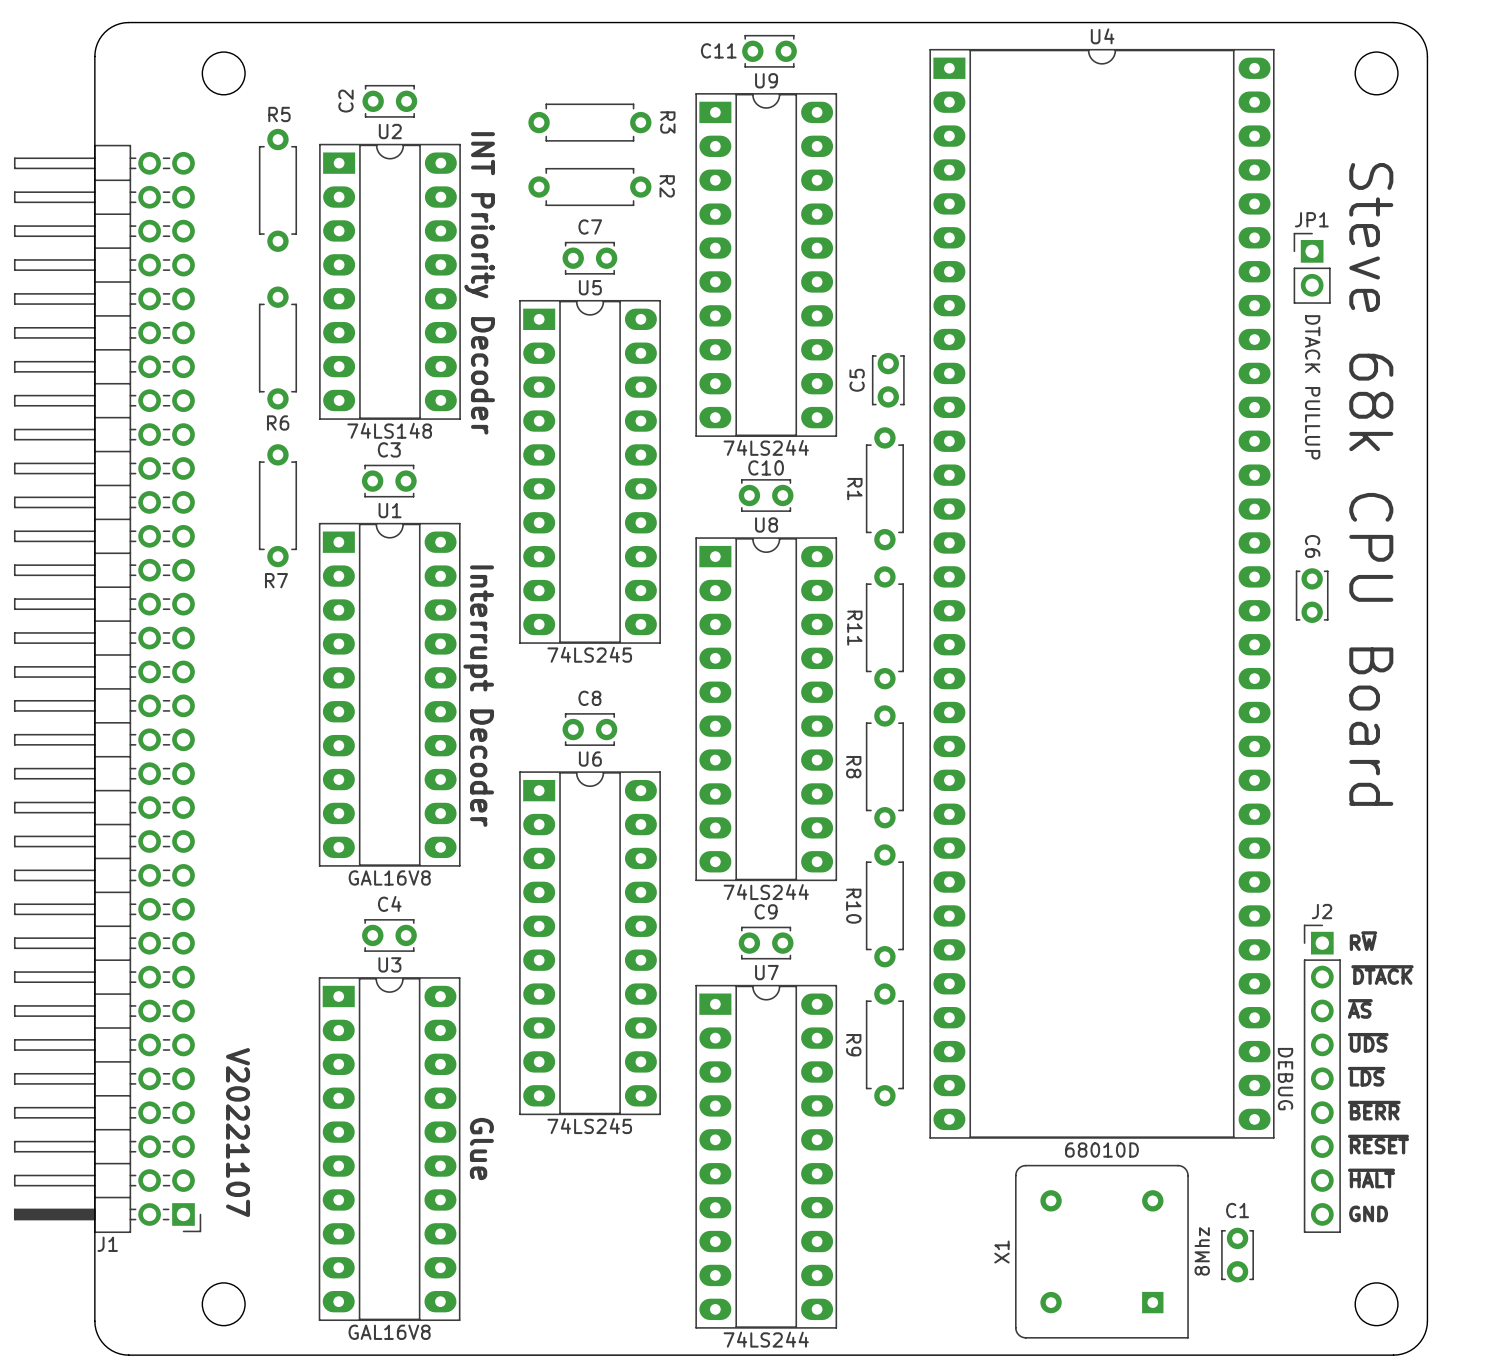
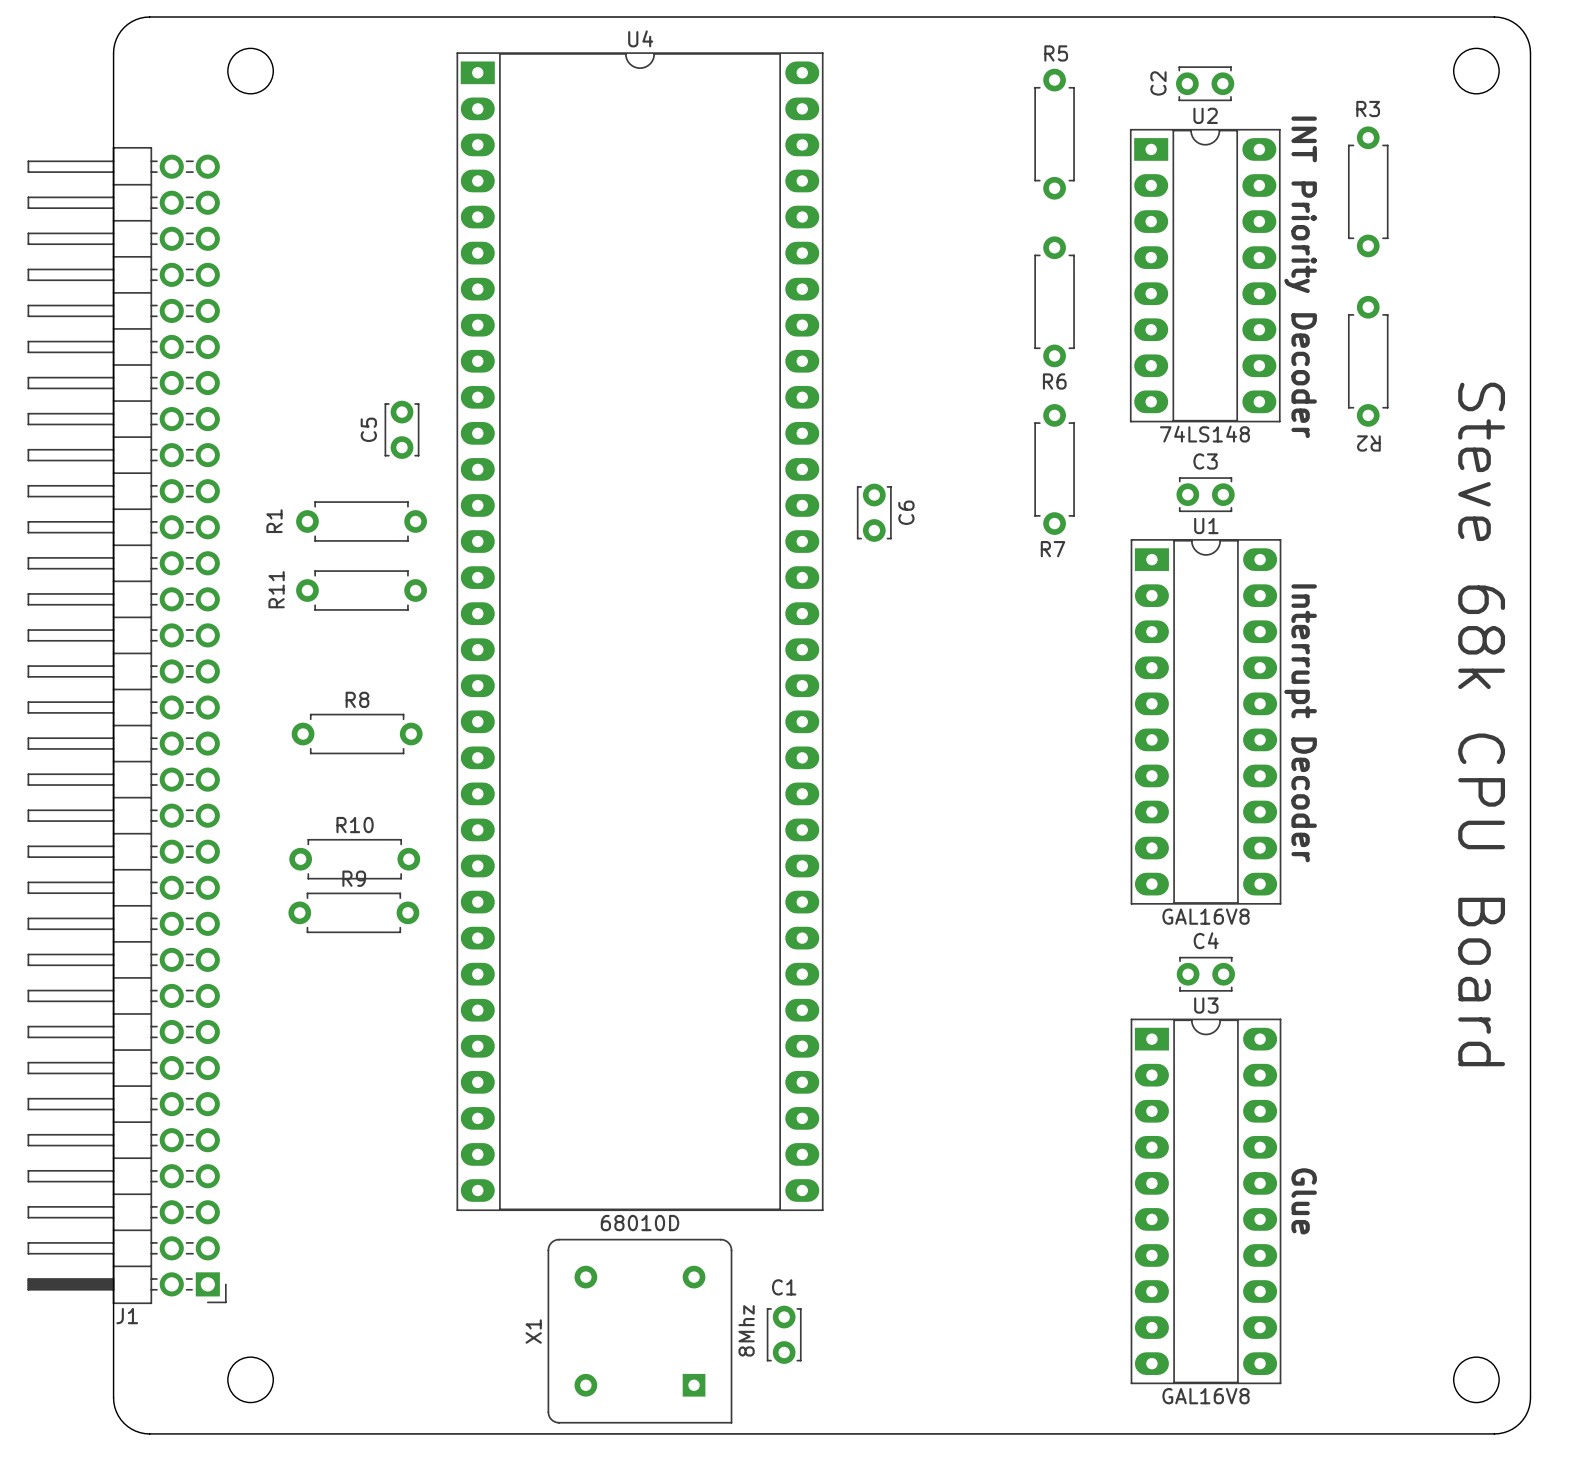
C11: (769, 51) -> none
C2 position: (389, 101) -> (1205, 83)
R3 rotation: 0° (589, 122) -> 90° clockwise (1368, 191)
R3 position: (589, 122) -> (1368, 191)
R3 name position: R3 (667, 122) -> R3 (1368, 109)
R2 rotation: 0° (589, 187) -> 90° clockwise (1368, 361)
R2 position: (589, 187) -> (1368, 361)
R5 position: (277, 190) -> (1054, 134)
C7: (589, 258) -> none
U9: 74LS244 (766, 264) -> none
text: none -> INT Priority Decoder (1300, 277)
JP1: DTACK PULLUP (1312, 268) -> none
U2 position: (389, 281) -> (1205, 275)
text: INT Priority Decoder (479, 283) -> none
R6 position: (277, 348) -> (1054, 301)
C5 position: (888, 380) -> (402, 429)
U5: 74LS245 (590, 471) -> none
C3 position: (389, 481) -> (1205, 494)
text position: Steve 68k CPU Board (1371, 484) -> Steve 68k CPU Board (1481, 724)
R1 rotation: 0° (884, 488) -> 90° clockwise (361, 521)
R1 position: (884, 488) -> (361, 521)
R1 name position: R1 (854, 489) -> R1 (274, 521)
C10: (766, 495) -> none
R7 position: (277, 505) -> (1054, 469)
C6 name rotation: 0° (1312, 546) -> 180° (906, 512)
C6 name position: C6 (1312, 546) -> C6 (906, 512)
U4 position: (1101, 593) -> (640, 631)
C6 position: (1312, 595) -> (874, 512)
R11 rotation: 0° (884, 627) -> 90° clockwise (361, 590)
R11 position: (884, 627) -> (361, 590)
R11 name position: R11 (854, 628) -> R11 (276, 589)
text: none -> Interrupt Decoder (1300, 723)
U1 position: (389, 694) -> (1206, 721)
text: Interrupt Decoder (478, 696) -> none
U8: 74LS244 (766, 709) -> none
C8: (589, 729) -> none
R8 rotation: 0° (884, 766) -> 90° clockwise (357, 734)
R8 position: (884, 766) -> (357, 734)
R10 rotation: 0° (884, 905) -> 90° clockwise (354, 859)
R10 position: (884, 905) -> (354, 859)
C4 position: (389, 935) -> (1205, 974)
text: R~{W} (1363, 941) -> none
U6: 74LS245 (590, 943) -> none
C9: (766, 943) -> none
text: ~{DTACK} (1382, 975) -> none
text: ~{AS} (1360, 1008) -> none
text: ~{UDS} (1368, 1042) -> none
R9 rotation: 0° (884, 1044) -> 90° clockwise (353, 912)
R9 position: (884, 1044) -> (353, 912)
text: ~{LDS} (1366, 1076) -> none
J2: DEBUG (1322, 1078) -> none
text: ~{BERR} (1374, 1110) -> none
text: V20221107 (238, 1132) -> none
text: none -> Glue (1304, 1201)
text: ~{RESET} (1378, 1144) -> none
U3 position: (389, 1149) -> (1206, 1201)
text: Glue (481, 1149) -> none
U7: 74LS244 (766, 1156) -> none
text: ~{HALT} (1371, 1178) -> none
text: GND (1368, 1213) -> none
X1 position: (1101, 1251) -> (639, 1331)
C1 position: (1237, 1255) -> (784, 1334)

